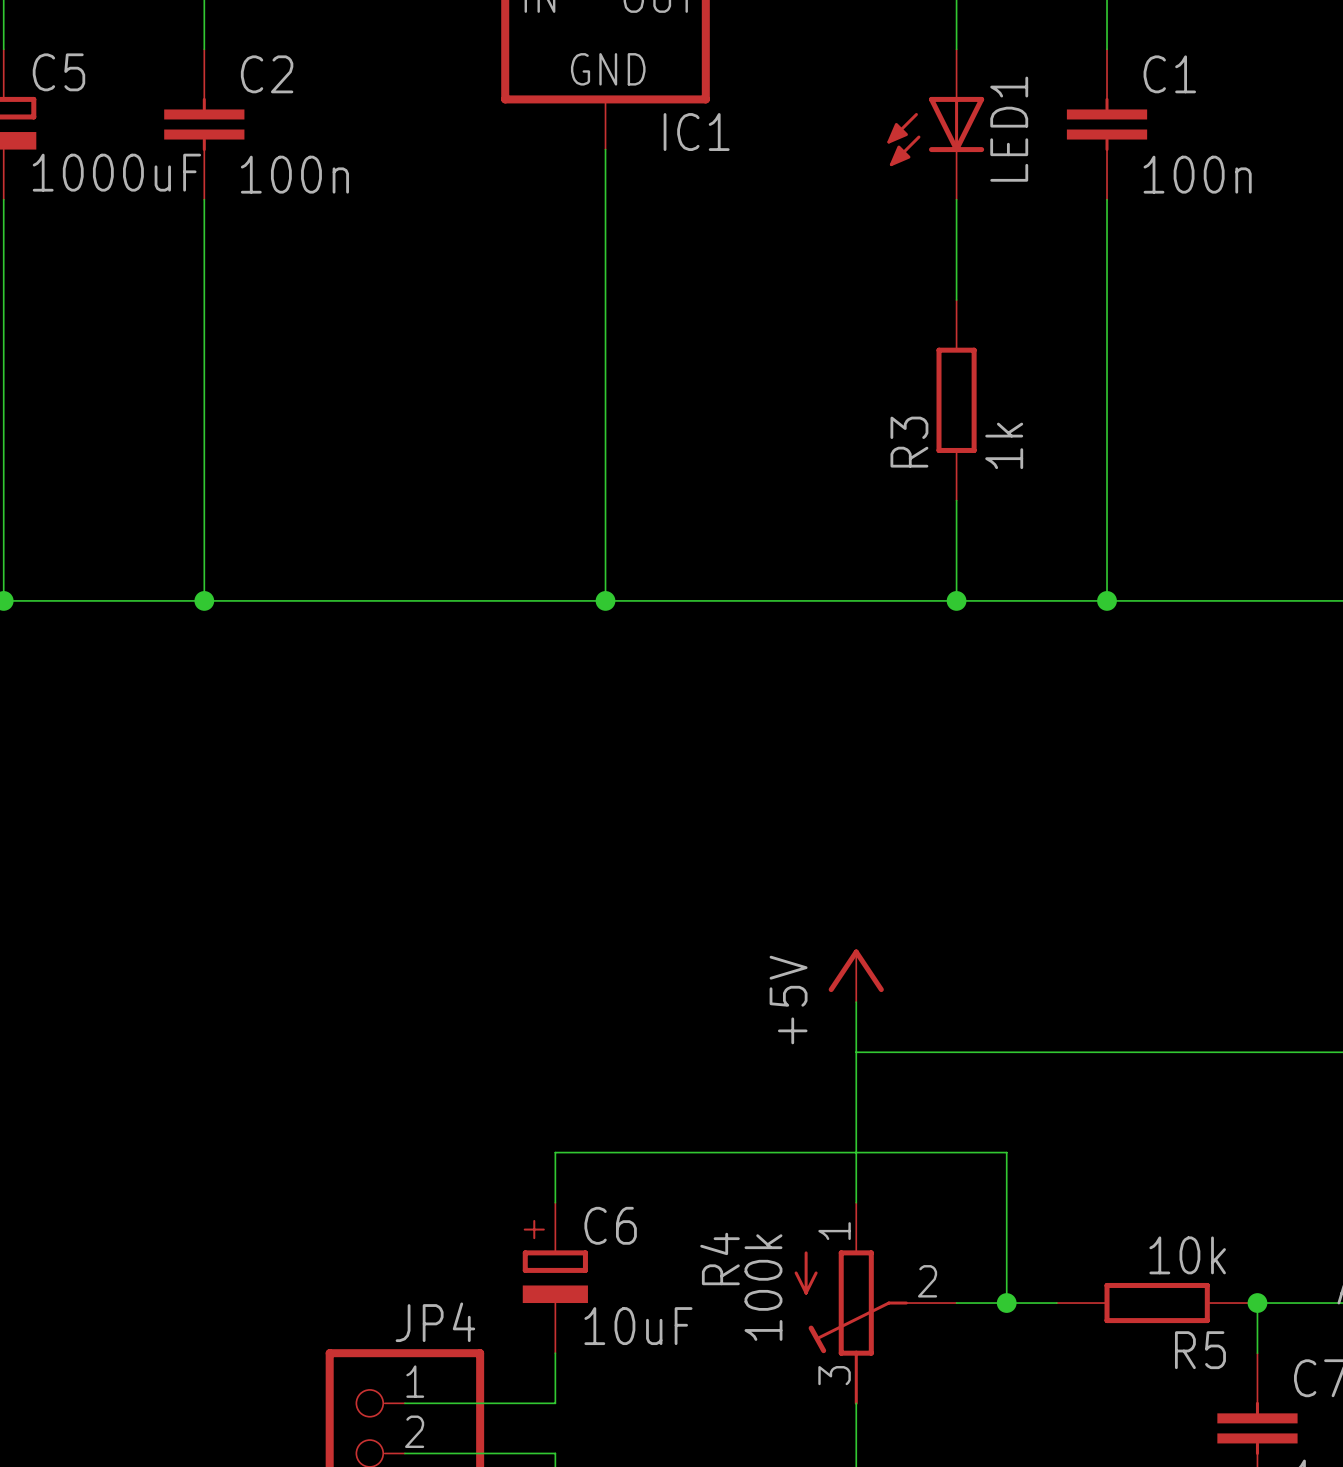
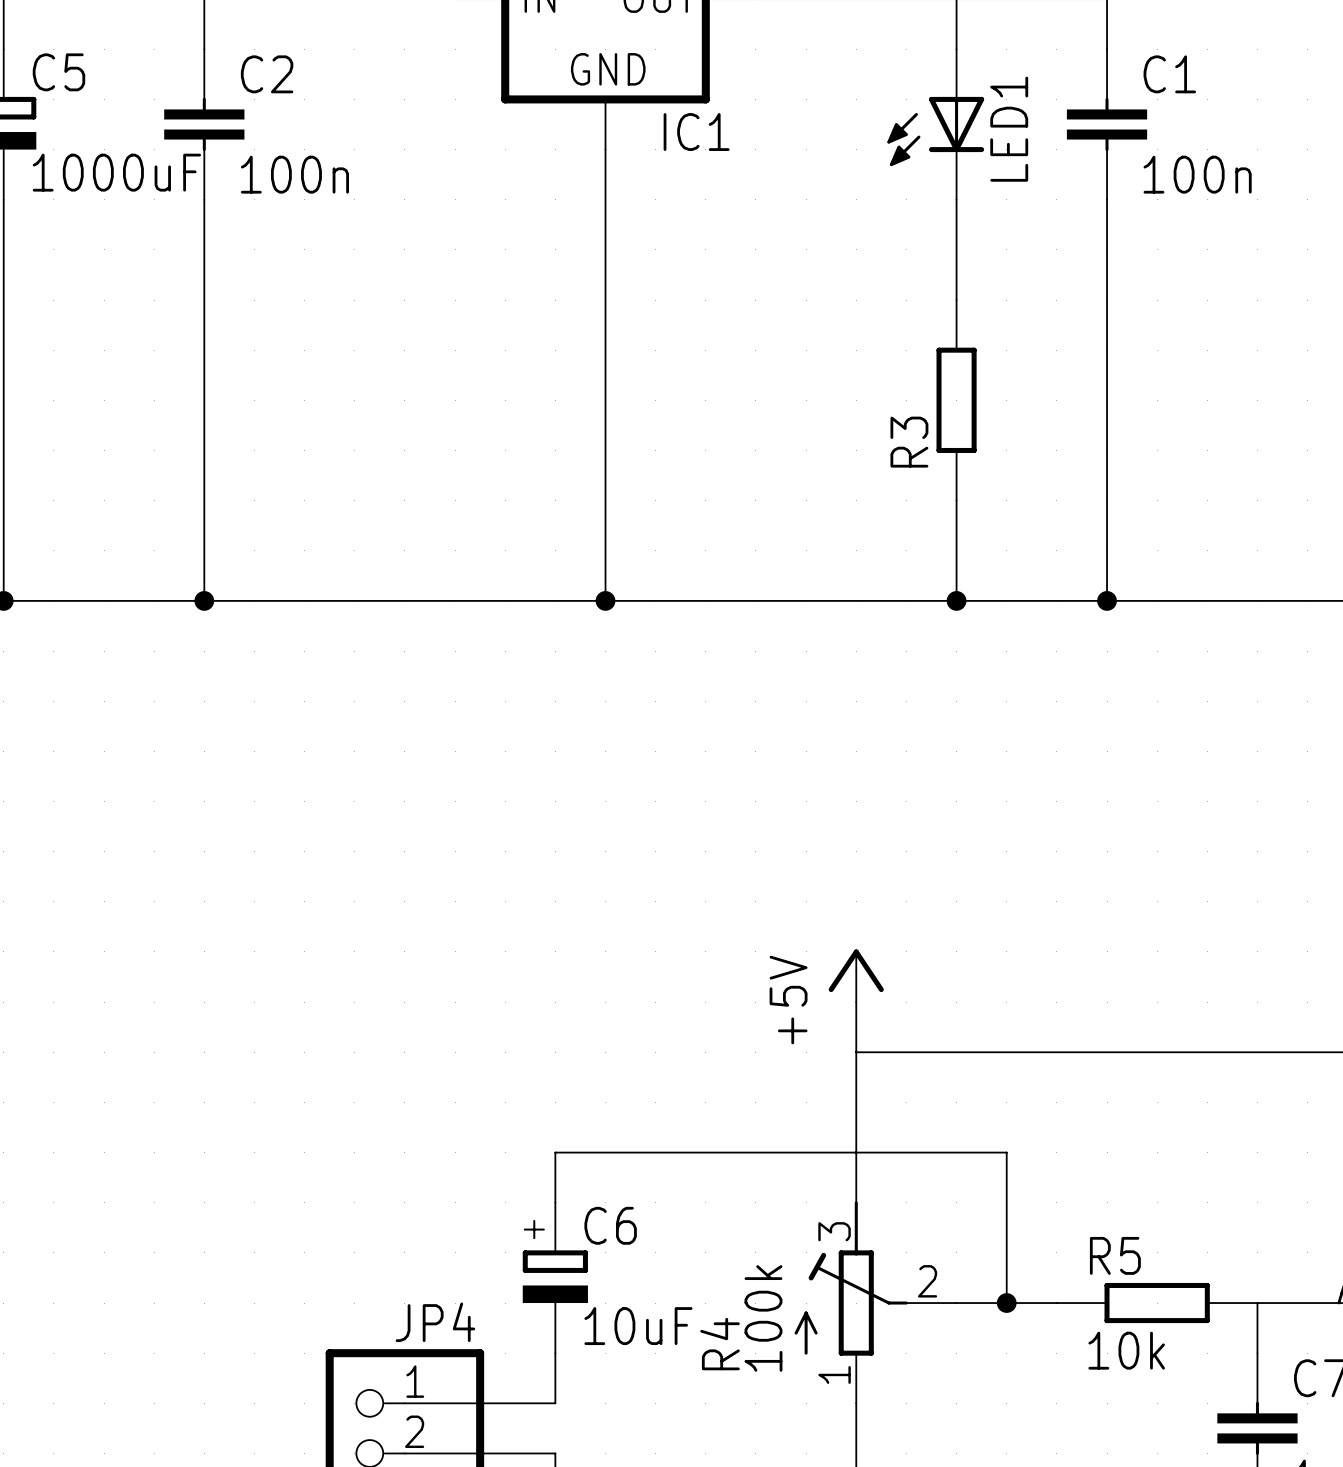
R3 value: 1k (1004, 445) -> none
R5 value position: 10k (1187, 1255) -> 10k (1126, 1350)
junction: (1257, 1303) -> none
R4 flip: as is (851, 1327) -> up-down (851, 1278)
R5 name position: R5 (1200, 1350) -> R5 (1115, 1255)

